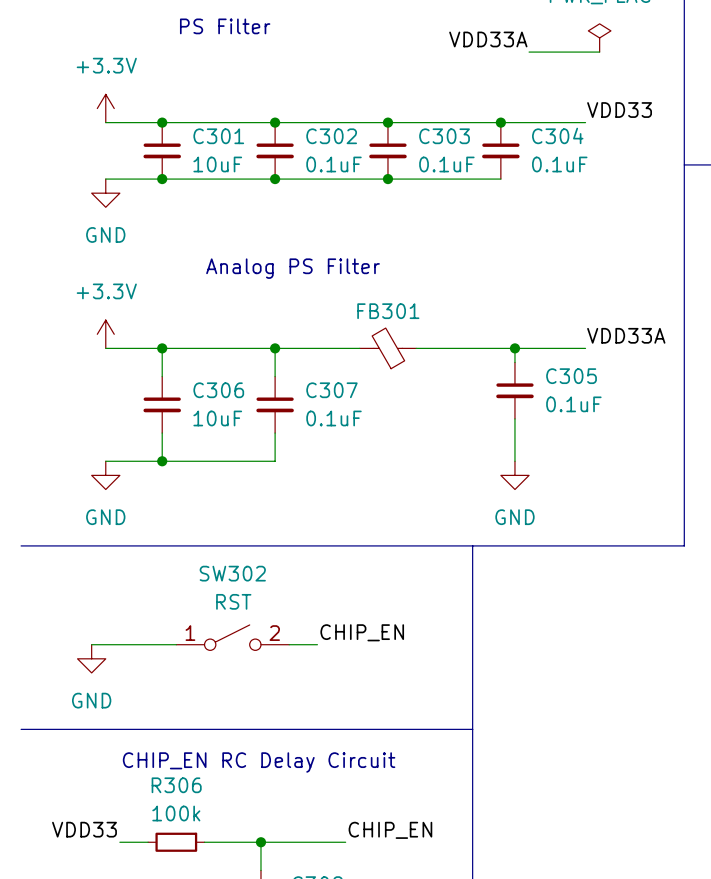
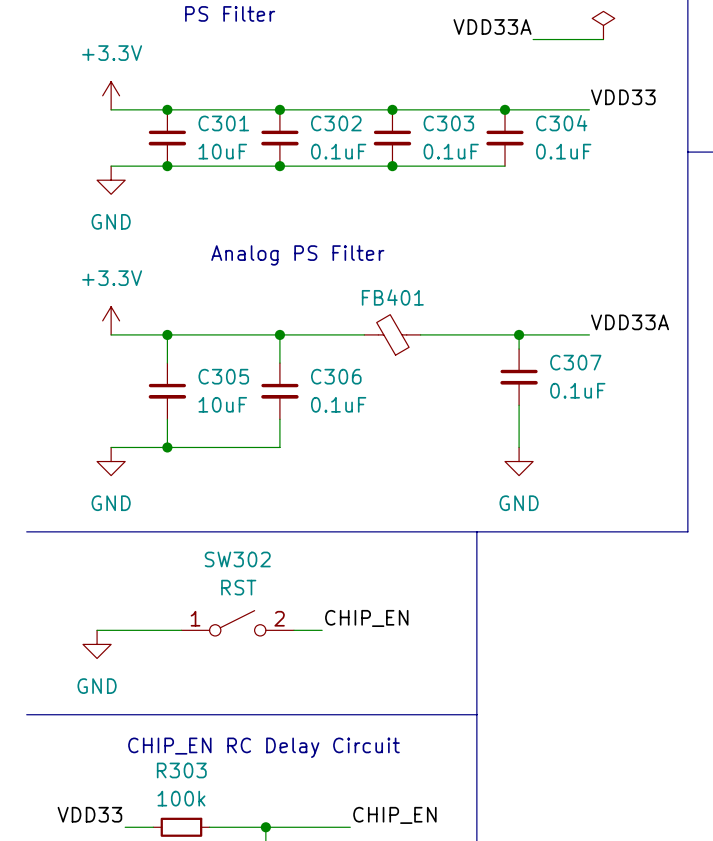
FB301 name: FB301 (388, 311) -> FB401 (392, 297)
C305 name: C305 (571, 376) -> C307 (575, 362)
C306 name: C306 (218, 390) -> C305 (223, 376)
C307 name: C307 (331, 390) -> C306 (336, 376)
R306 name: R306 (176, 785) -> R303 (181, 770)

